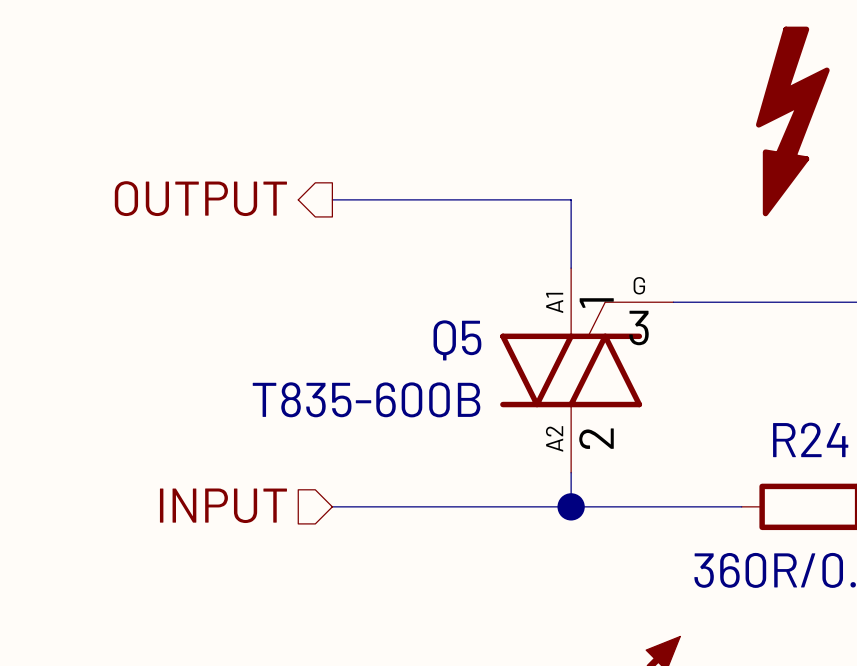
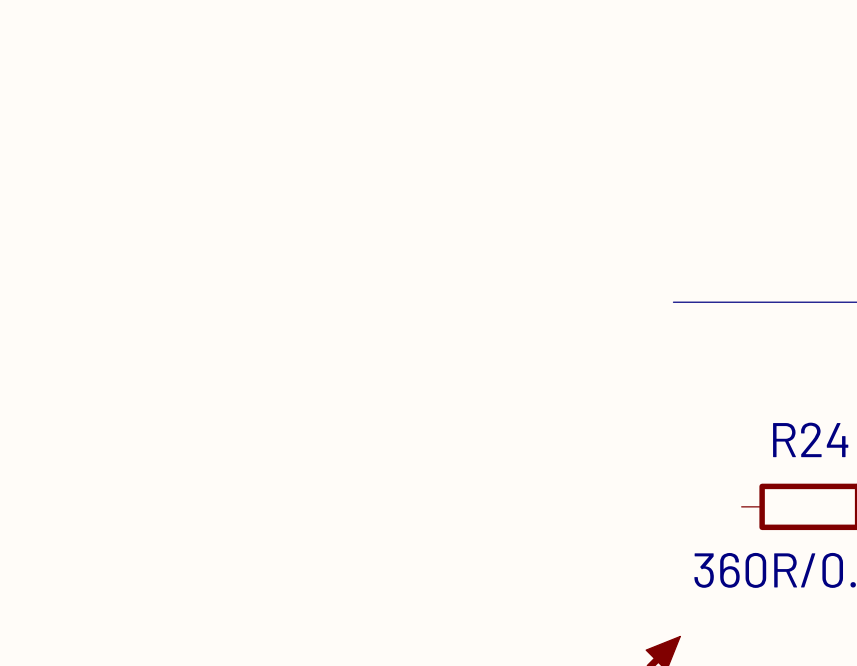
power symbol: (792, 121) -> none
hierarchical label: OUTPUT (200, 198) -> none
wire: (332, 199) (571, 199) (571, 268) -> none
Q5: T835-600B (586, 370) -> none
wire: (571, 472) (571, 506) -> none
hierarchical label: INPUT (223, 505) -> none
wire: (332, 506) (741, 506) -> none
junction: (571, 506) -> none

